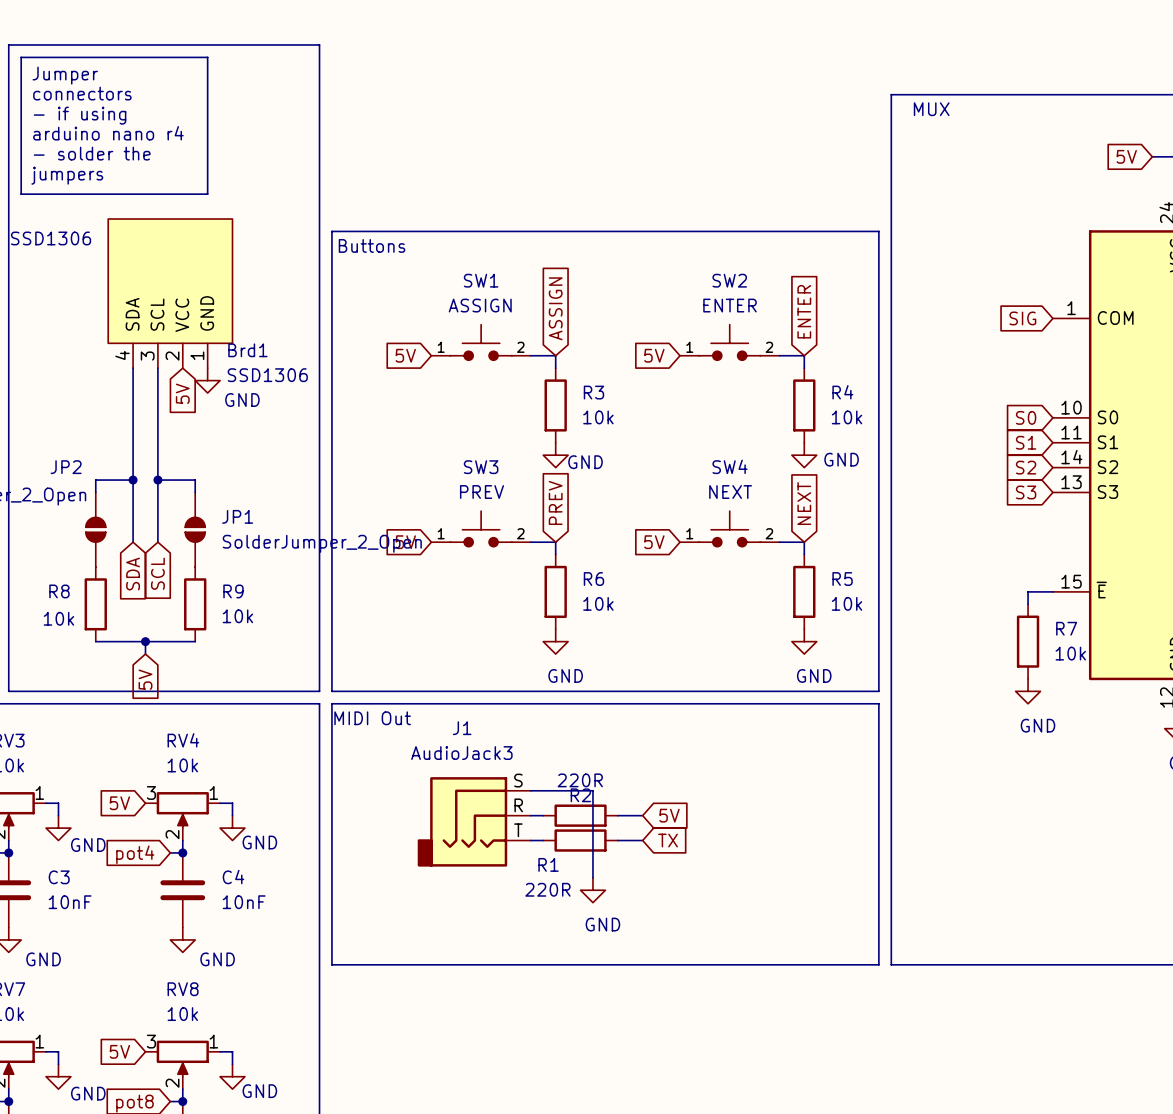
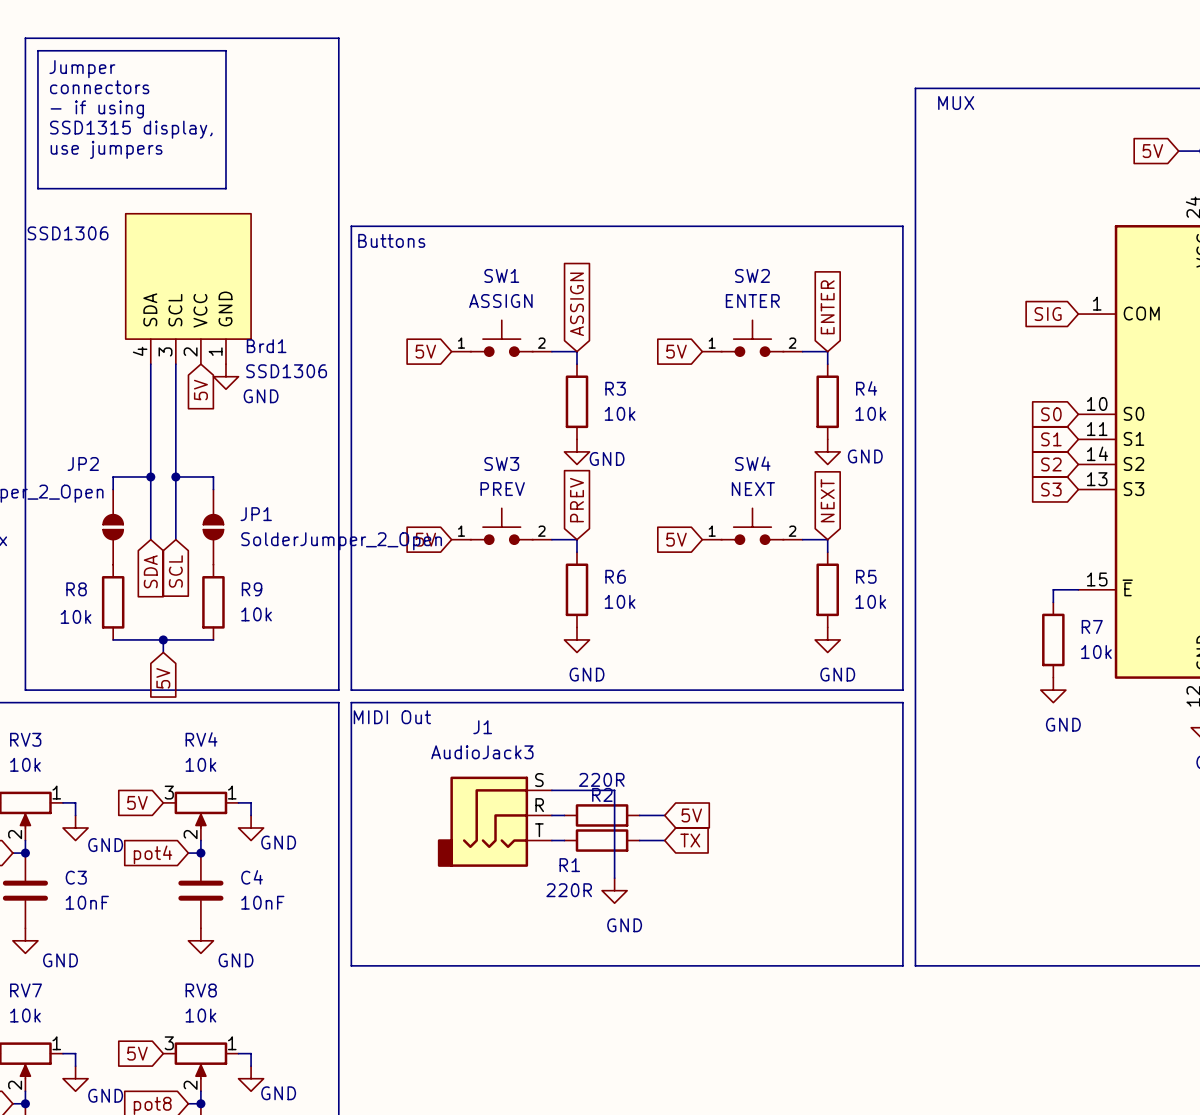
text: arduino nano r4 (108, 133) -> SSD1315 display, (131, 129)
text: - solder the (92, 153) -> use jumpers (106, 149)
text: jumpers (67, 175) -> none

